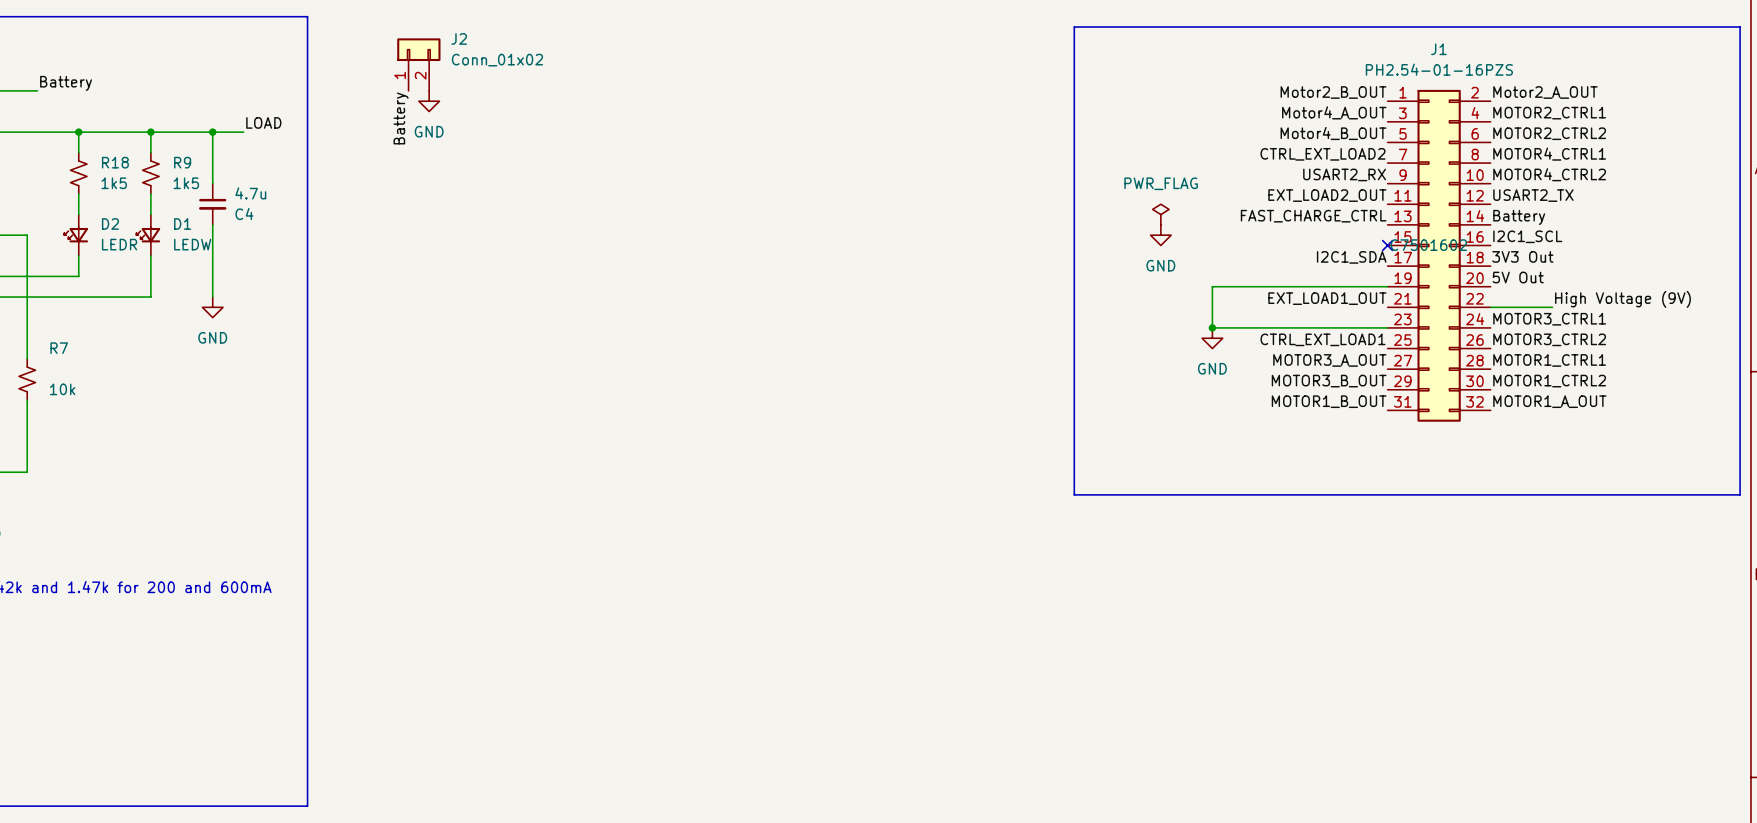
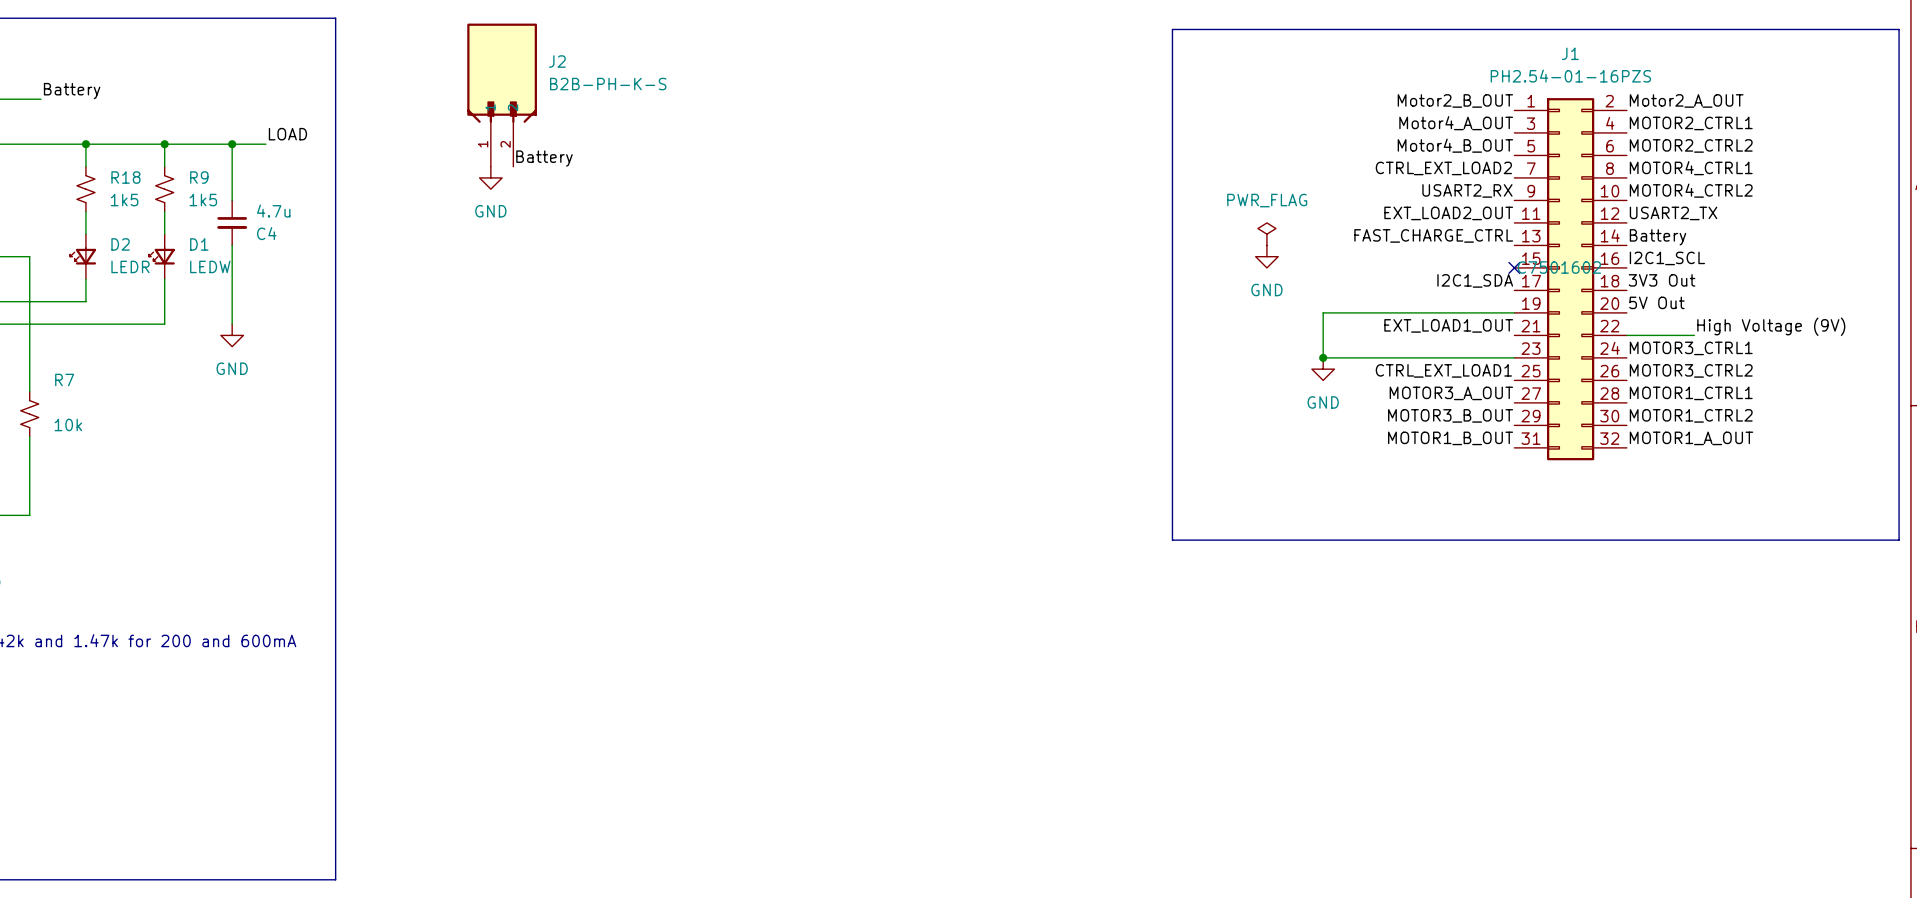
J2 symbol: [397, 38, 441, 91] -> [467, 23, 537, 167]
J2 value: Conn_01x02 (497, 60) -> B2B-PH-K-S (608, 84)
power symbol position: GND (429, 101) -> GND (490, 177)
label rotation: 0° (401, 118) -> 90° clockwise (544, 158)
label position: Battery (401, 118) -> Battery (544, 158)

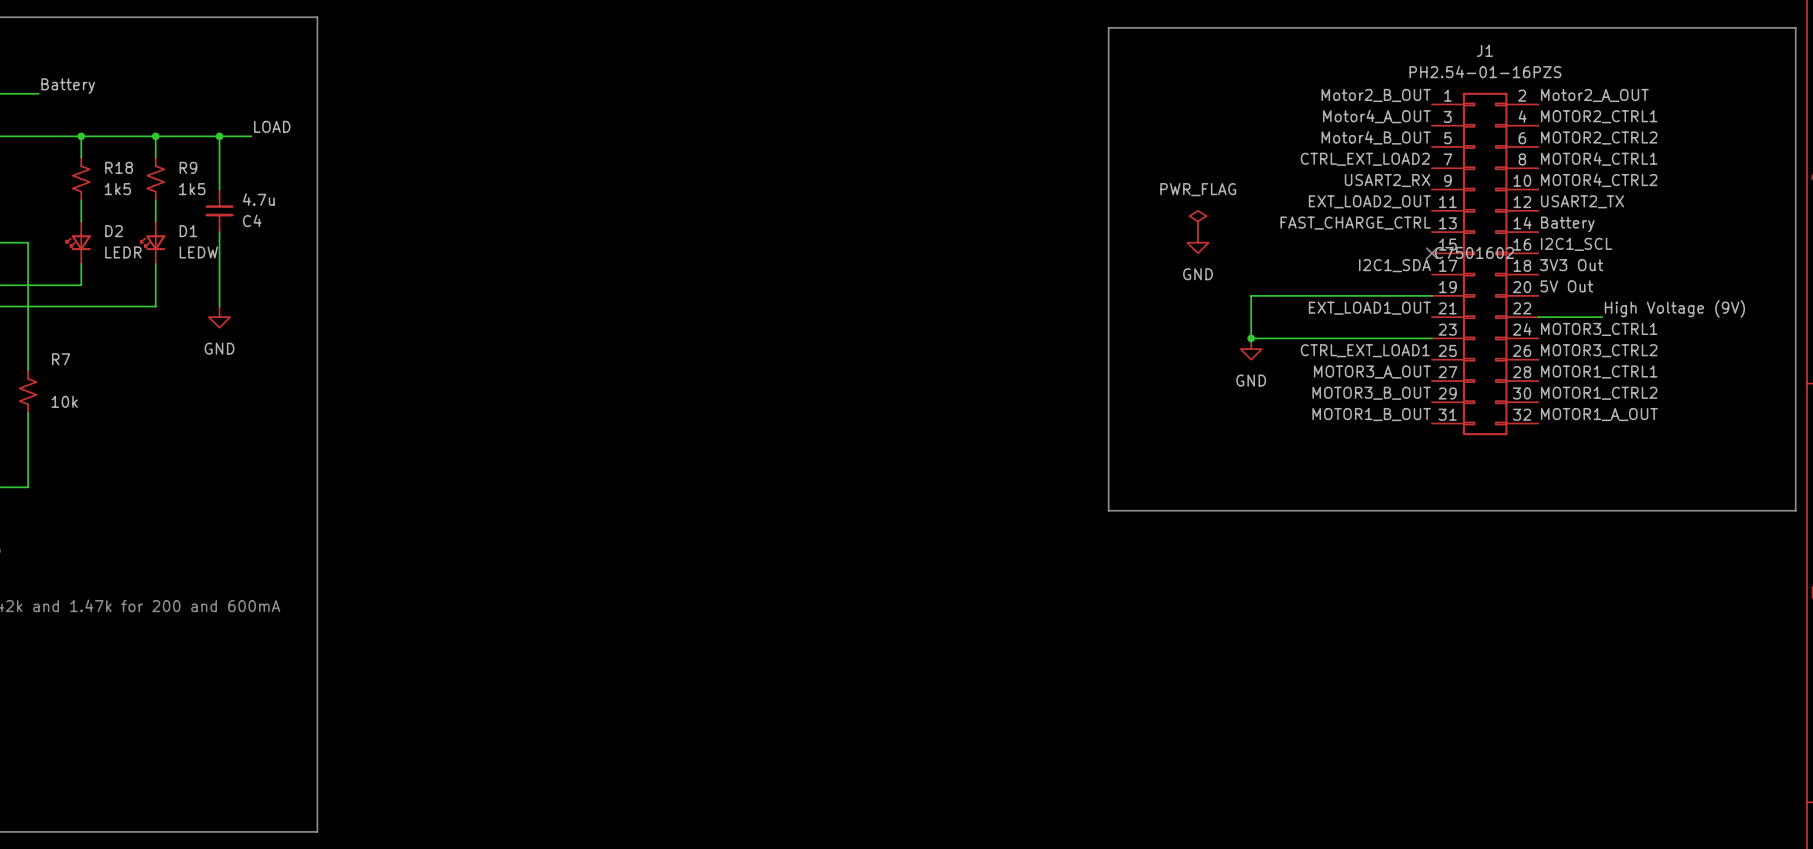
J2: B2B-PH-K-S (502, 95) -> none
label: Battery (544, 158) -> none
power symbol: GND (490, 177) -> none

